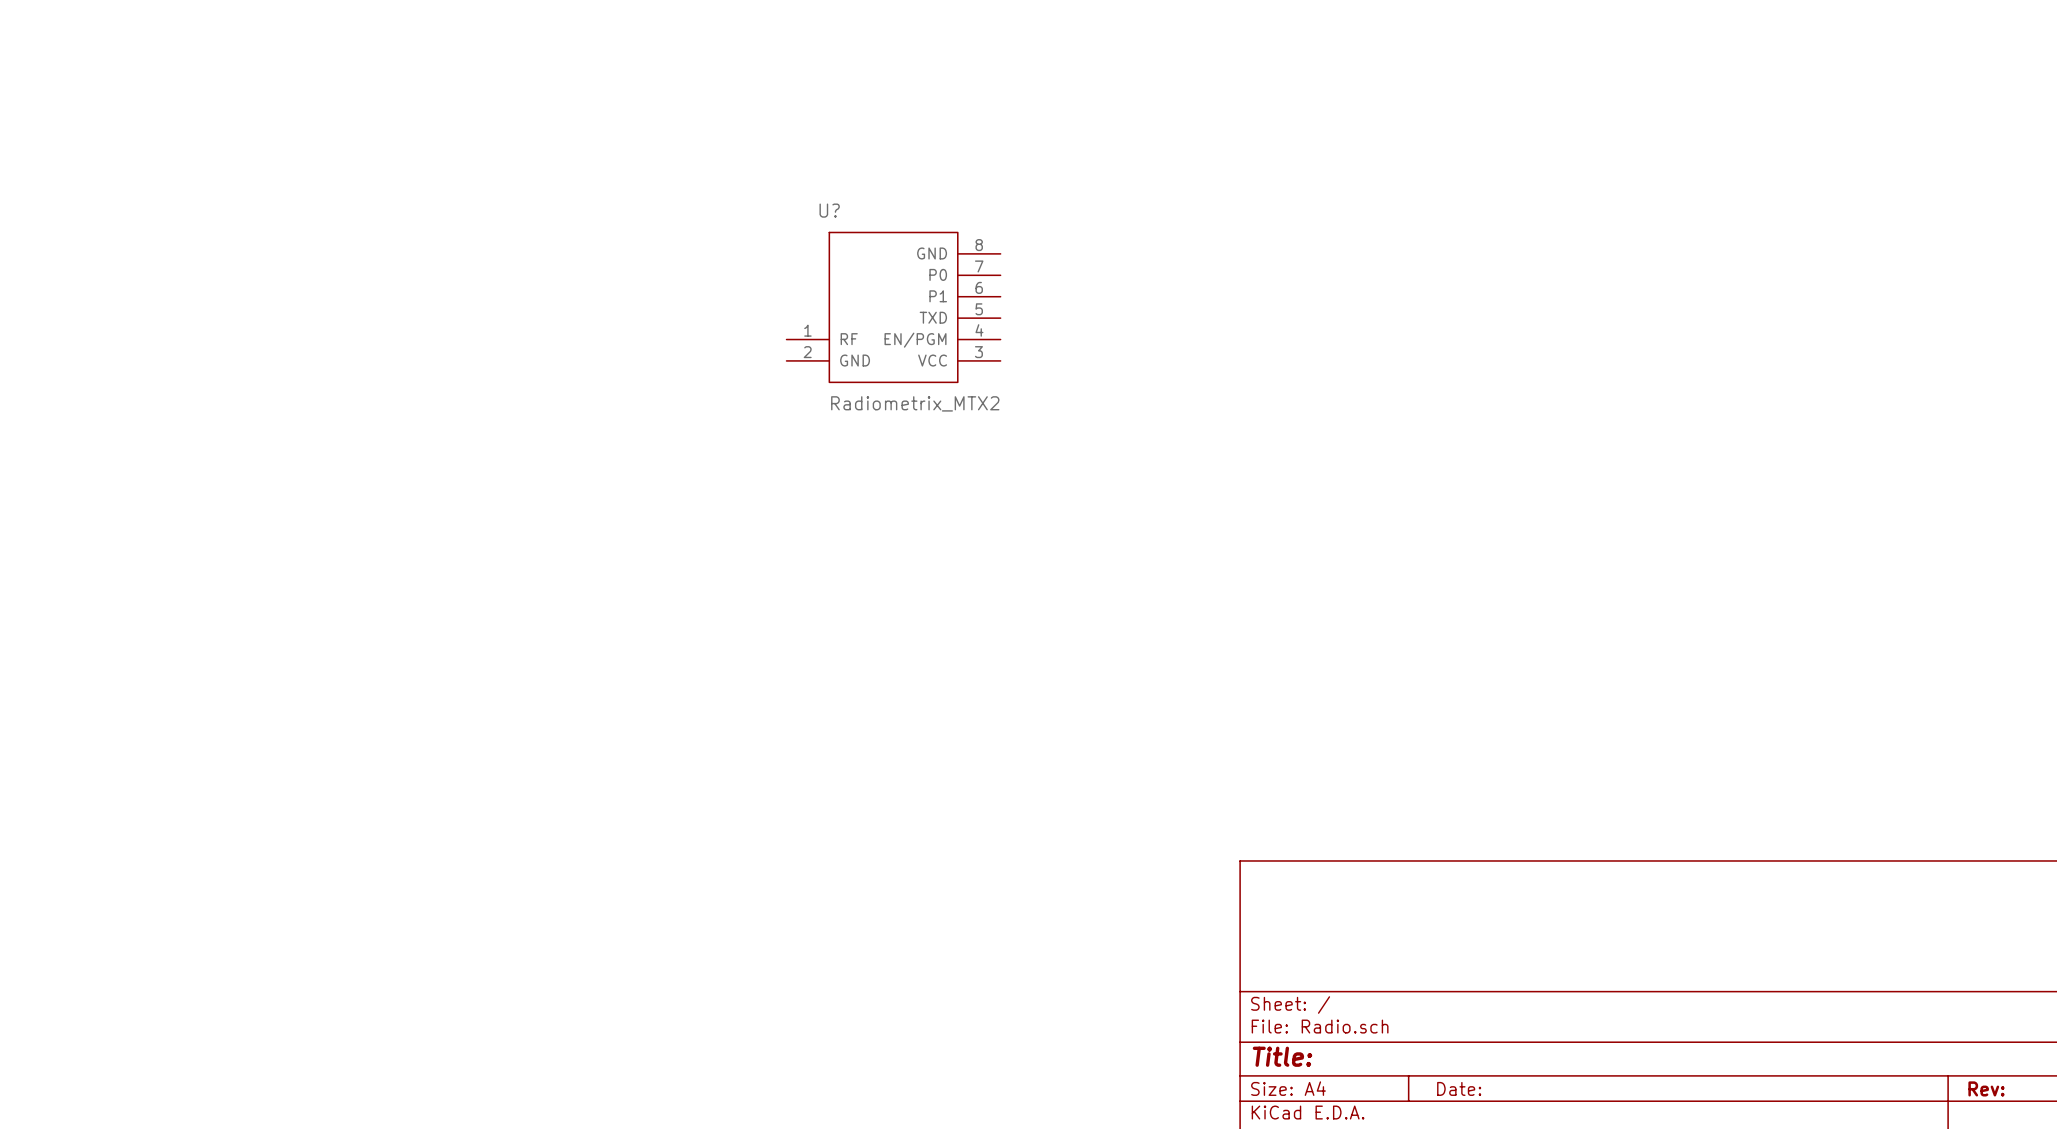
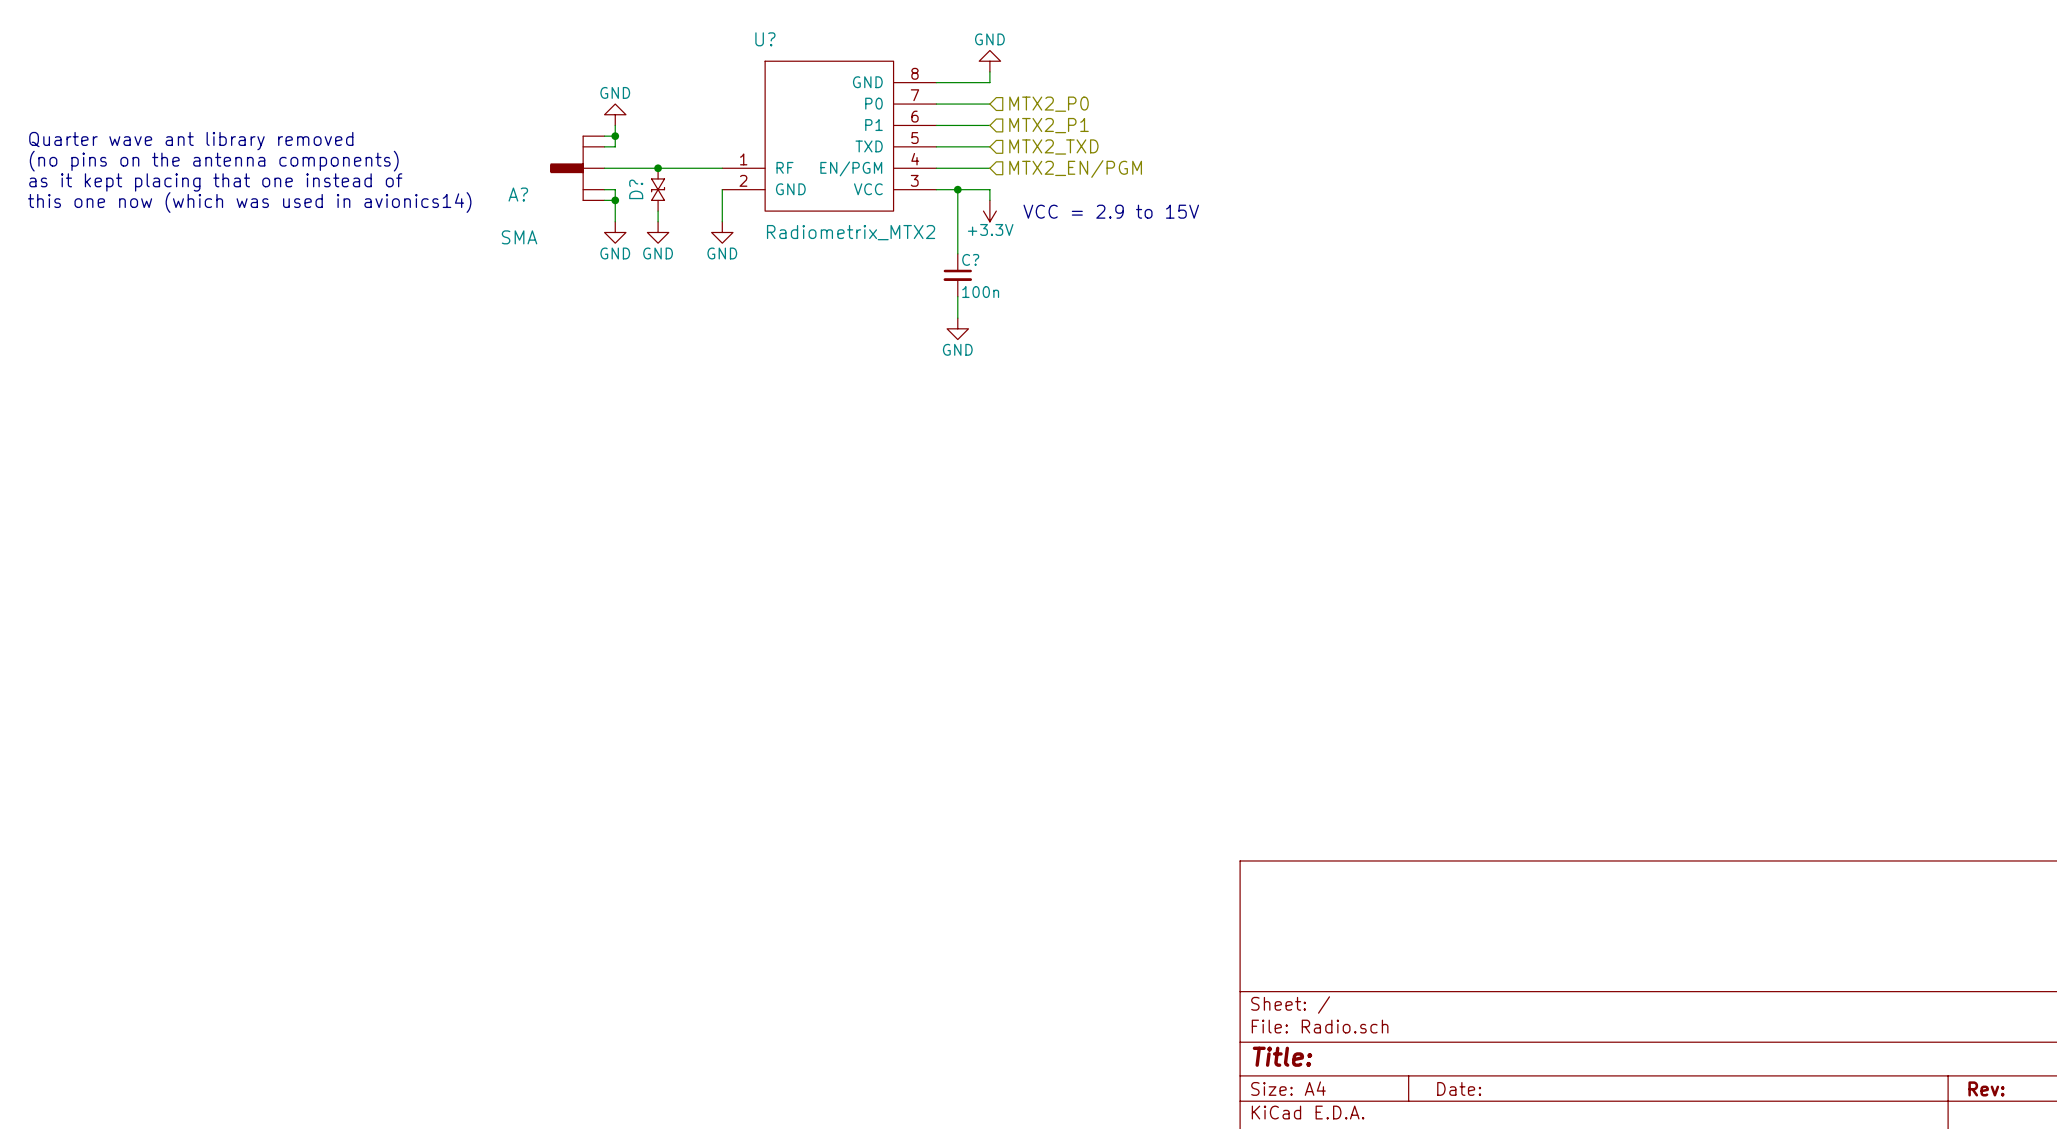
power symbol: none -> GND (989, 61)
wire: none -> (989, 71) (989, 82) (936, 82)
wire: none -> (936, 104) (989, 104)
hierarchical label: none -> MTX2_P0 (1049, 104)
power symbol: none -> GND (615, 114)
wire: none -> (615, 125) (615, 146) (604, 146)
wire: none -> (936, 125) (989, 125)
hierarchical label: none -> MTX2_P1 (1049, 125)
wire: none -> (604, 136) (615, 136)
junction: none -> (615, 136)
text: none -> Quarter wave ant library removed (191, 141)
wire: none -> (936, 146) (989, 146)
hierarchical label: none -> MTX2_TXD (1053, 146)
text: none -> (no pins on the antenna components) (214, 161)
A?: none -> SMA (577, 168)
wire: none -> (604, 168) (722, 168)
junction: none -> (658, 168)
wire: none -> (936, 168) (989, 168)
hierarchical label: none -> MTX2_EN/PGM (1075, 169)
text: none -> as it kept placing that one instead of (215, 182)
wire: none -> (604, 189) (615, 189) (615, 221)
D?: none -> (658, 189)
wire: none -> (722, 189) (722, 221)
wire: none -> (936, 189) (989, 189) (989, 200)
wire: none -> (957, 189) (957, 253)
junction: none -> (957, 189)
wire: none -> (604, 200) (615, 200)
junction: none -> (615, 200)
text: none -> this one now (which was used in avionics14) (249, 202)
wire: none -> (658, 211) (658, 221)
power symbol: none -> +3.3V (989, 211)
text: none -> VCC = 2.9 to 15V (1111, 211)
power symbol: none -> GND (615, 232)
power symbol: none -> GND (658, 232)
power symbol: none -> GND (722, 232)
C?: none -> 100n (957, 275)
U? position: (893, 307) -> (829, 136)
power symbol: none -> GND (957, 328)

